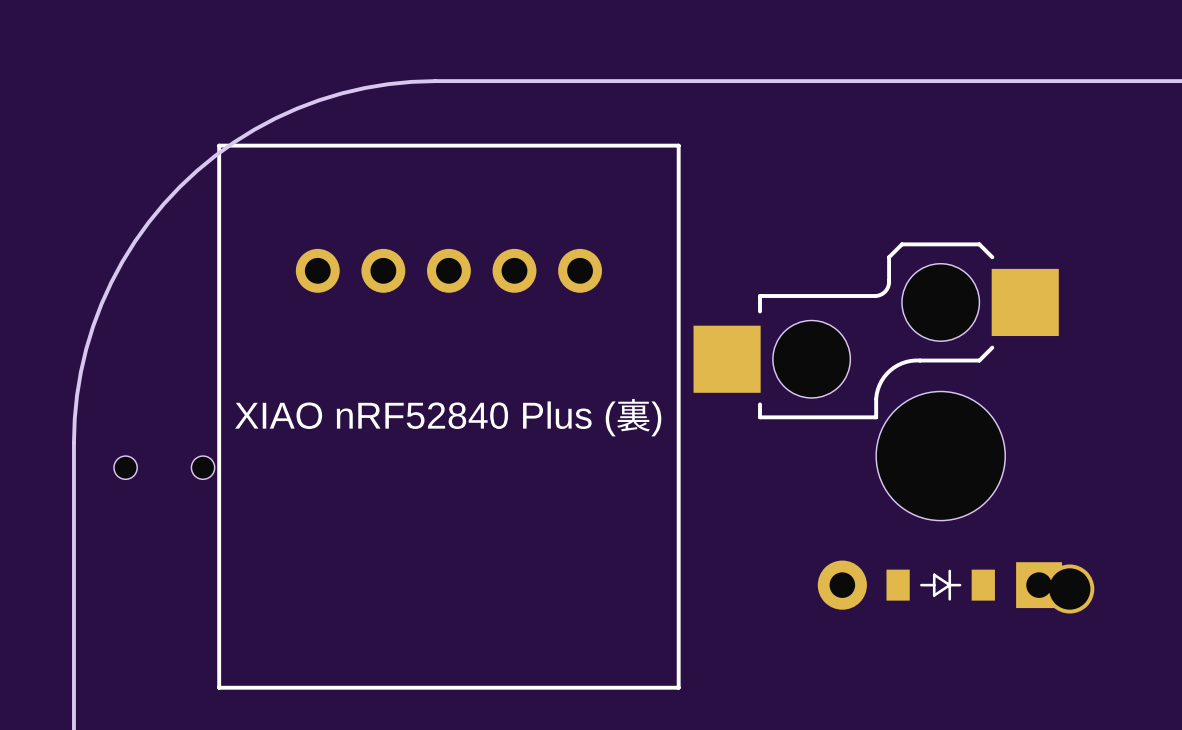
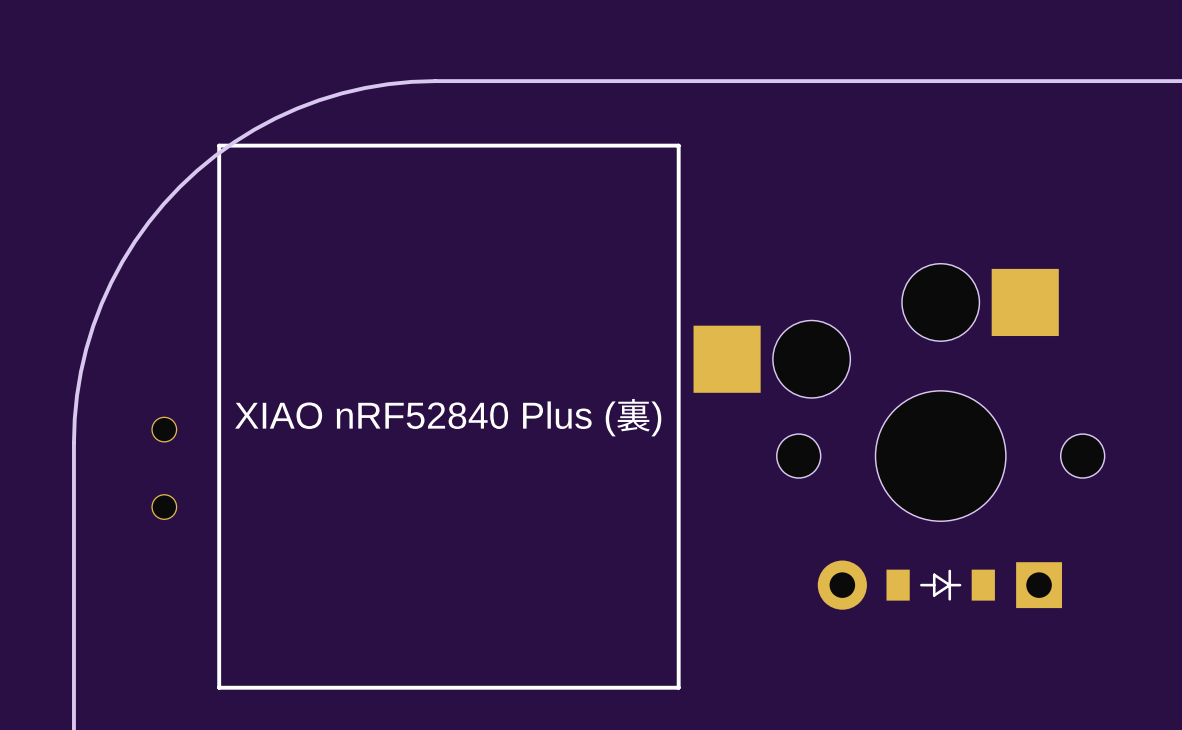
part: (448, 270) -> none
part: none -> (899, 392)
part: (893, 427) -> none
part footprint: [113, 456, 215, 480] -> [151, 416, 178, 520]

